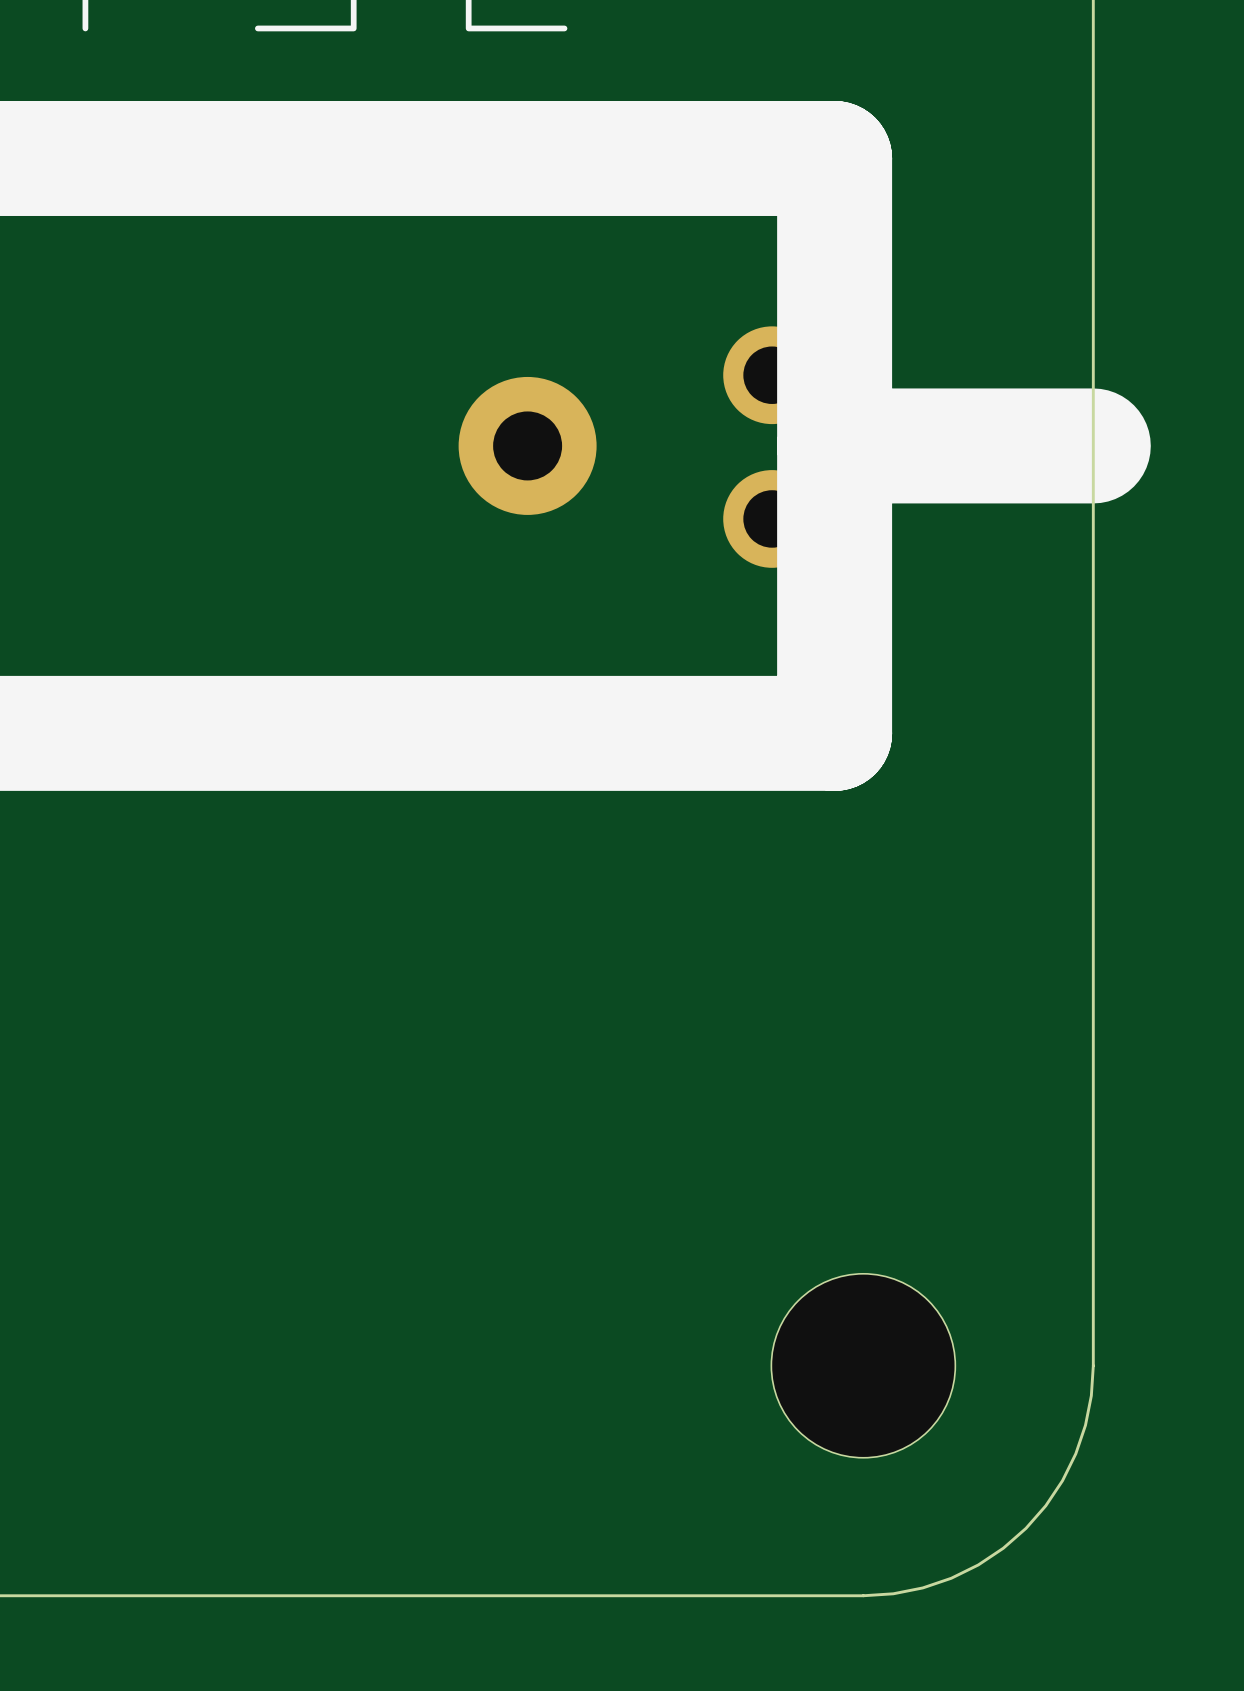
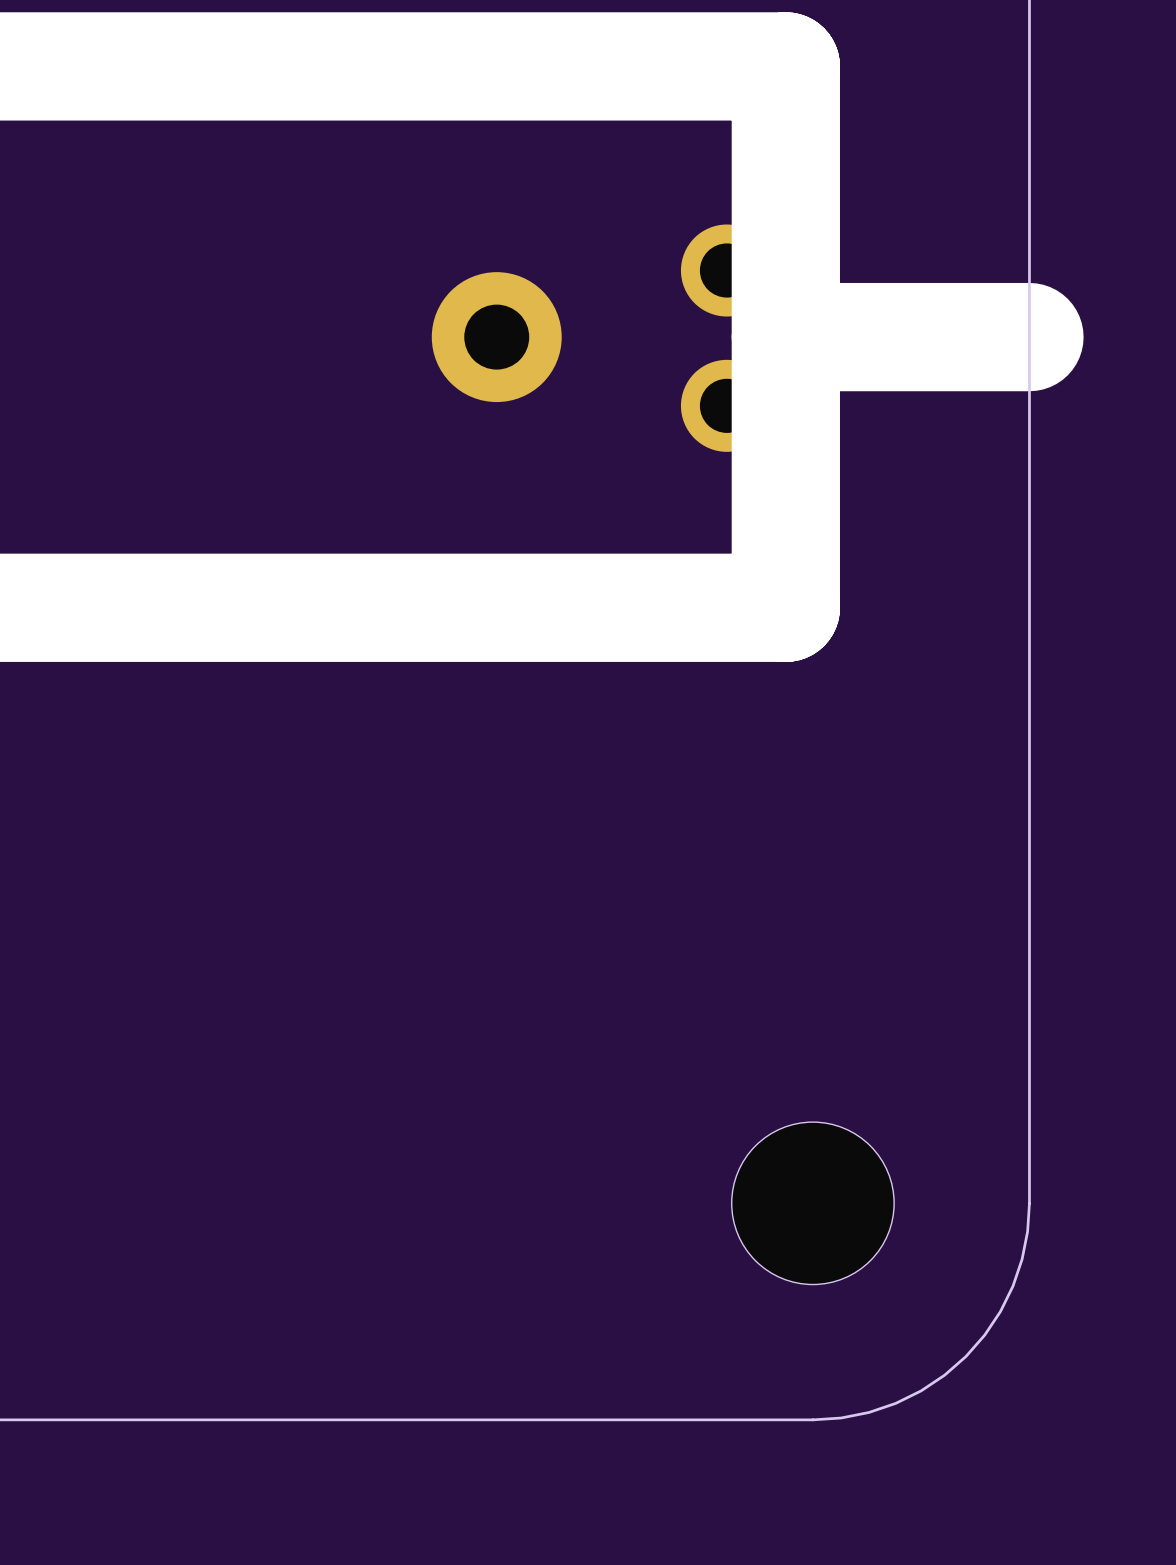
part footprint: [771, 1273, 956, 1458] -> [731, 1122, 895, 1285]

